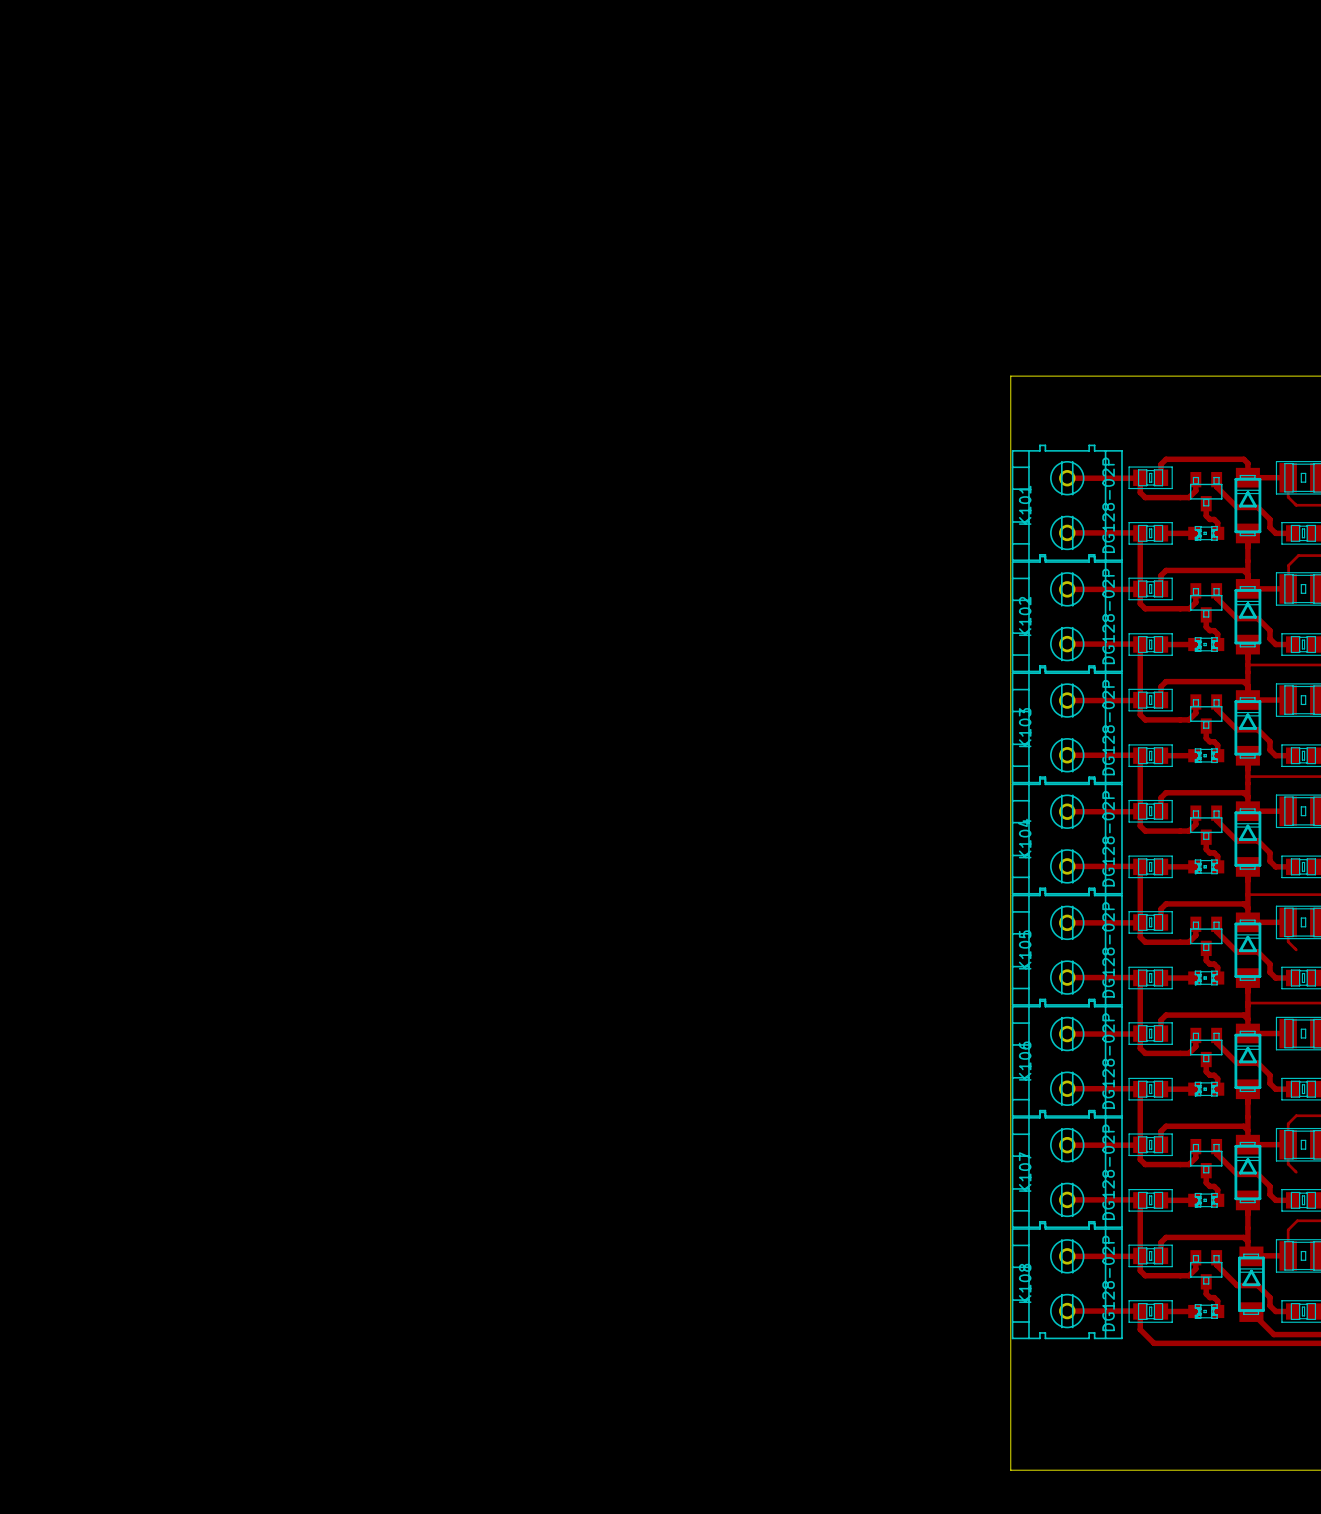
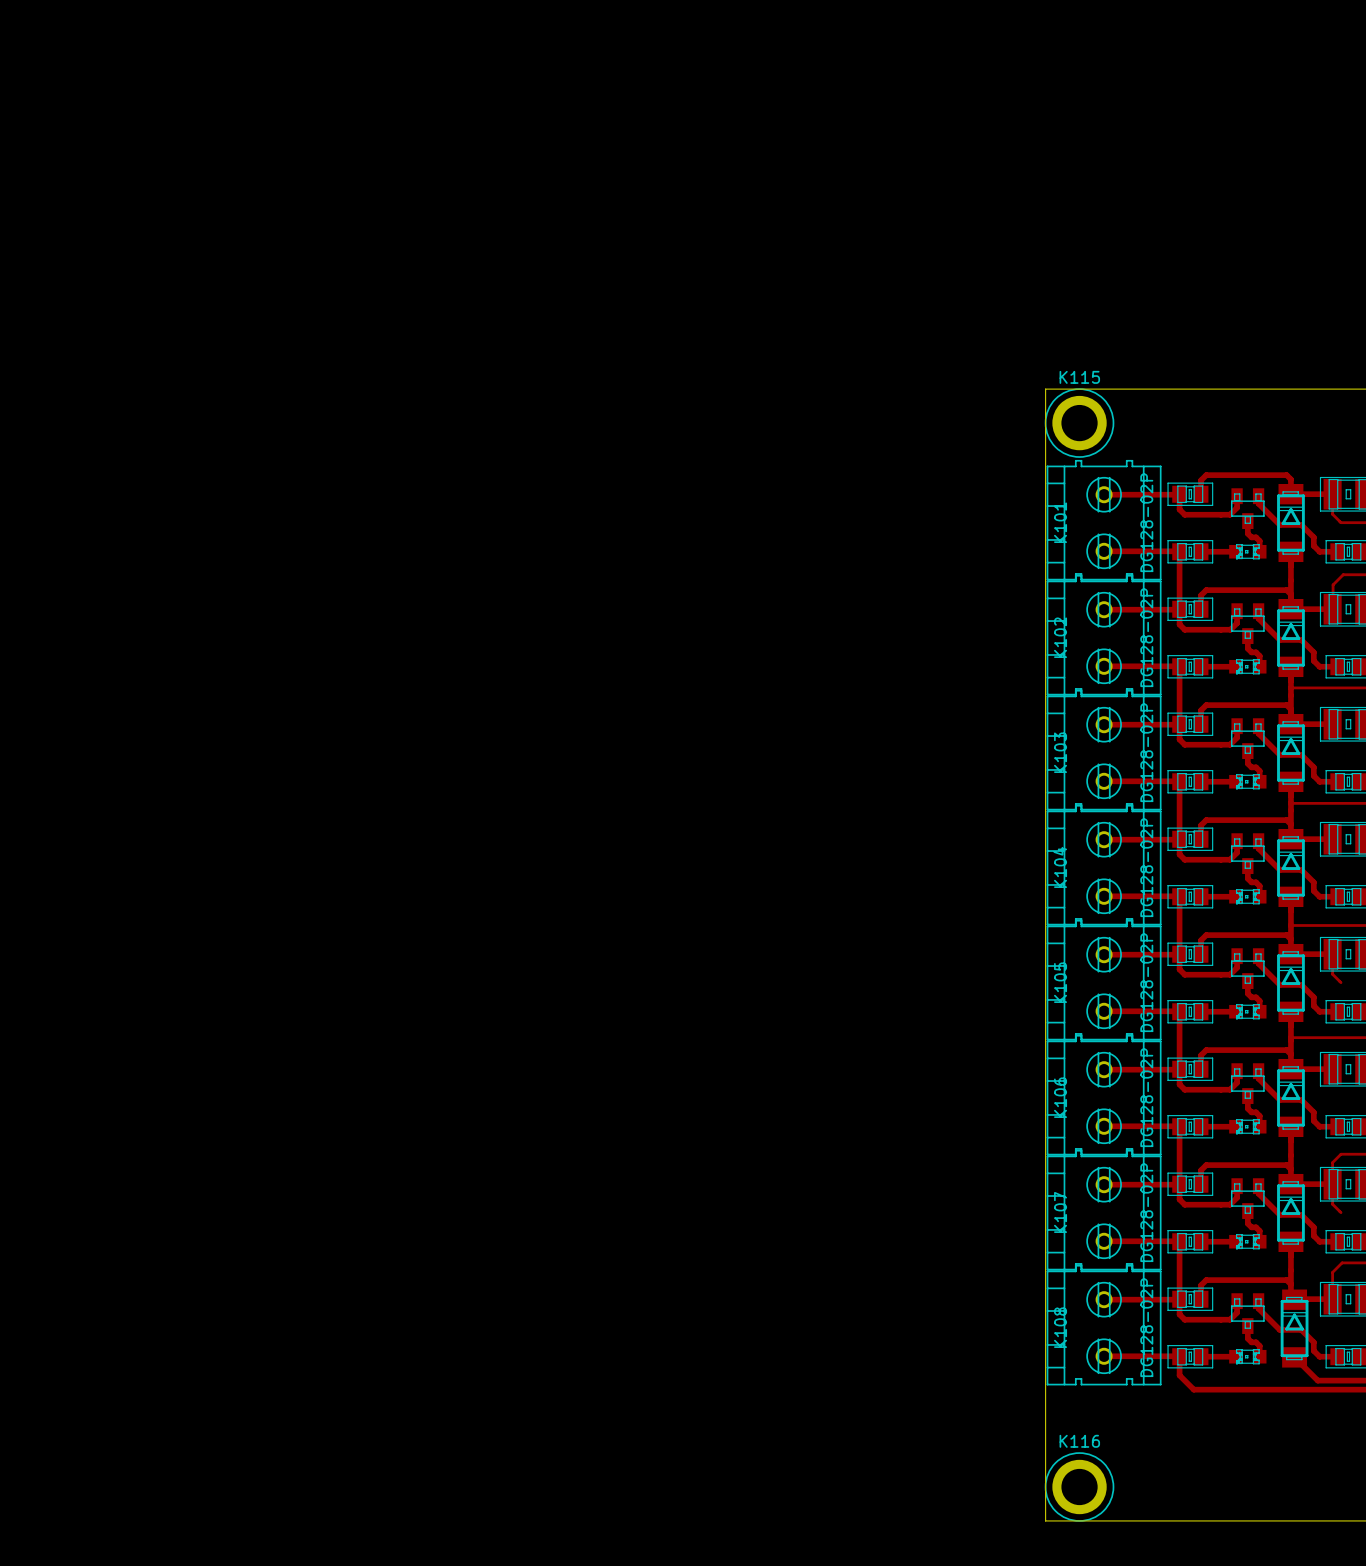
K115: none -> (1079, 423)
K116: none -> (1079, 1487)

